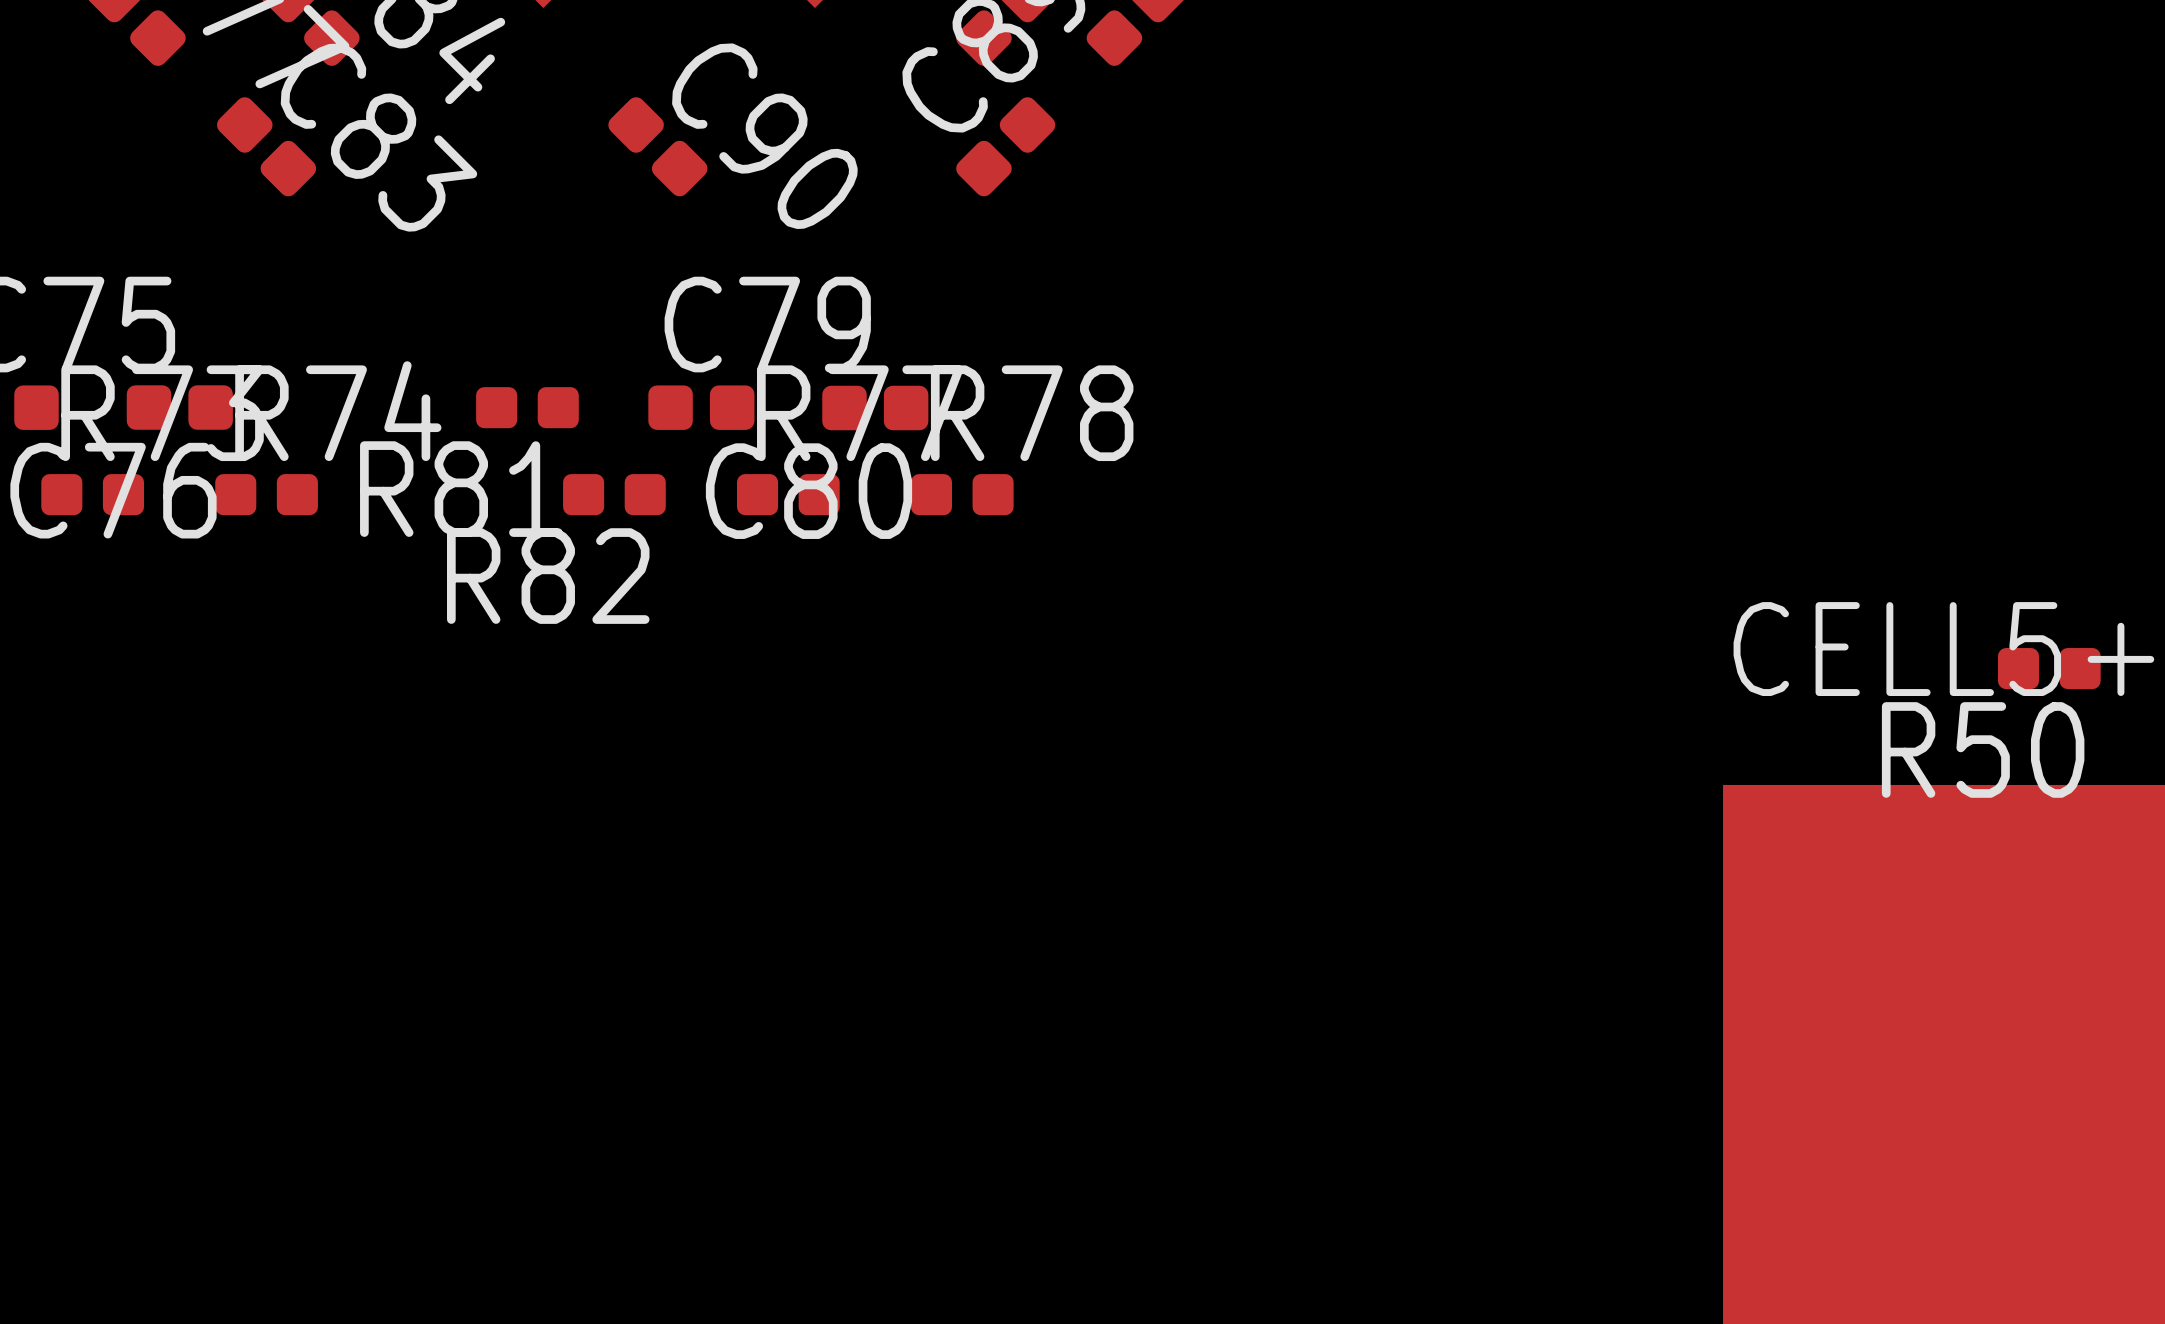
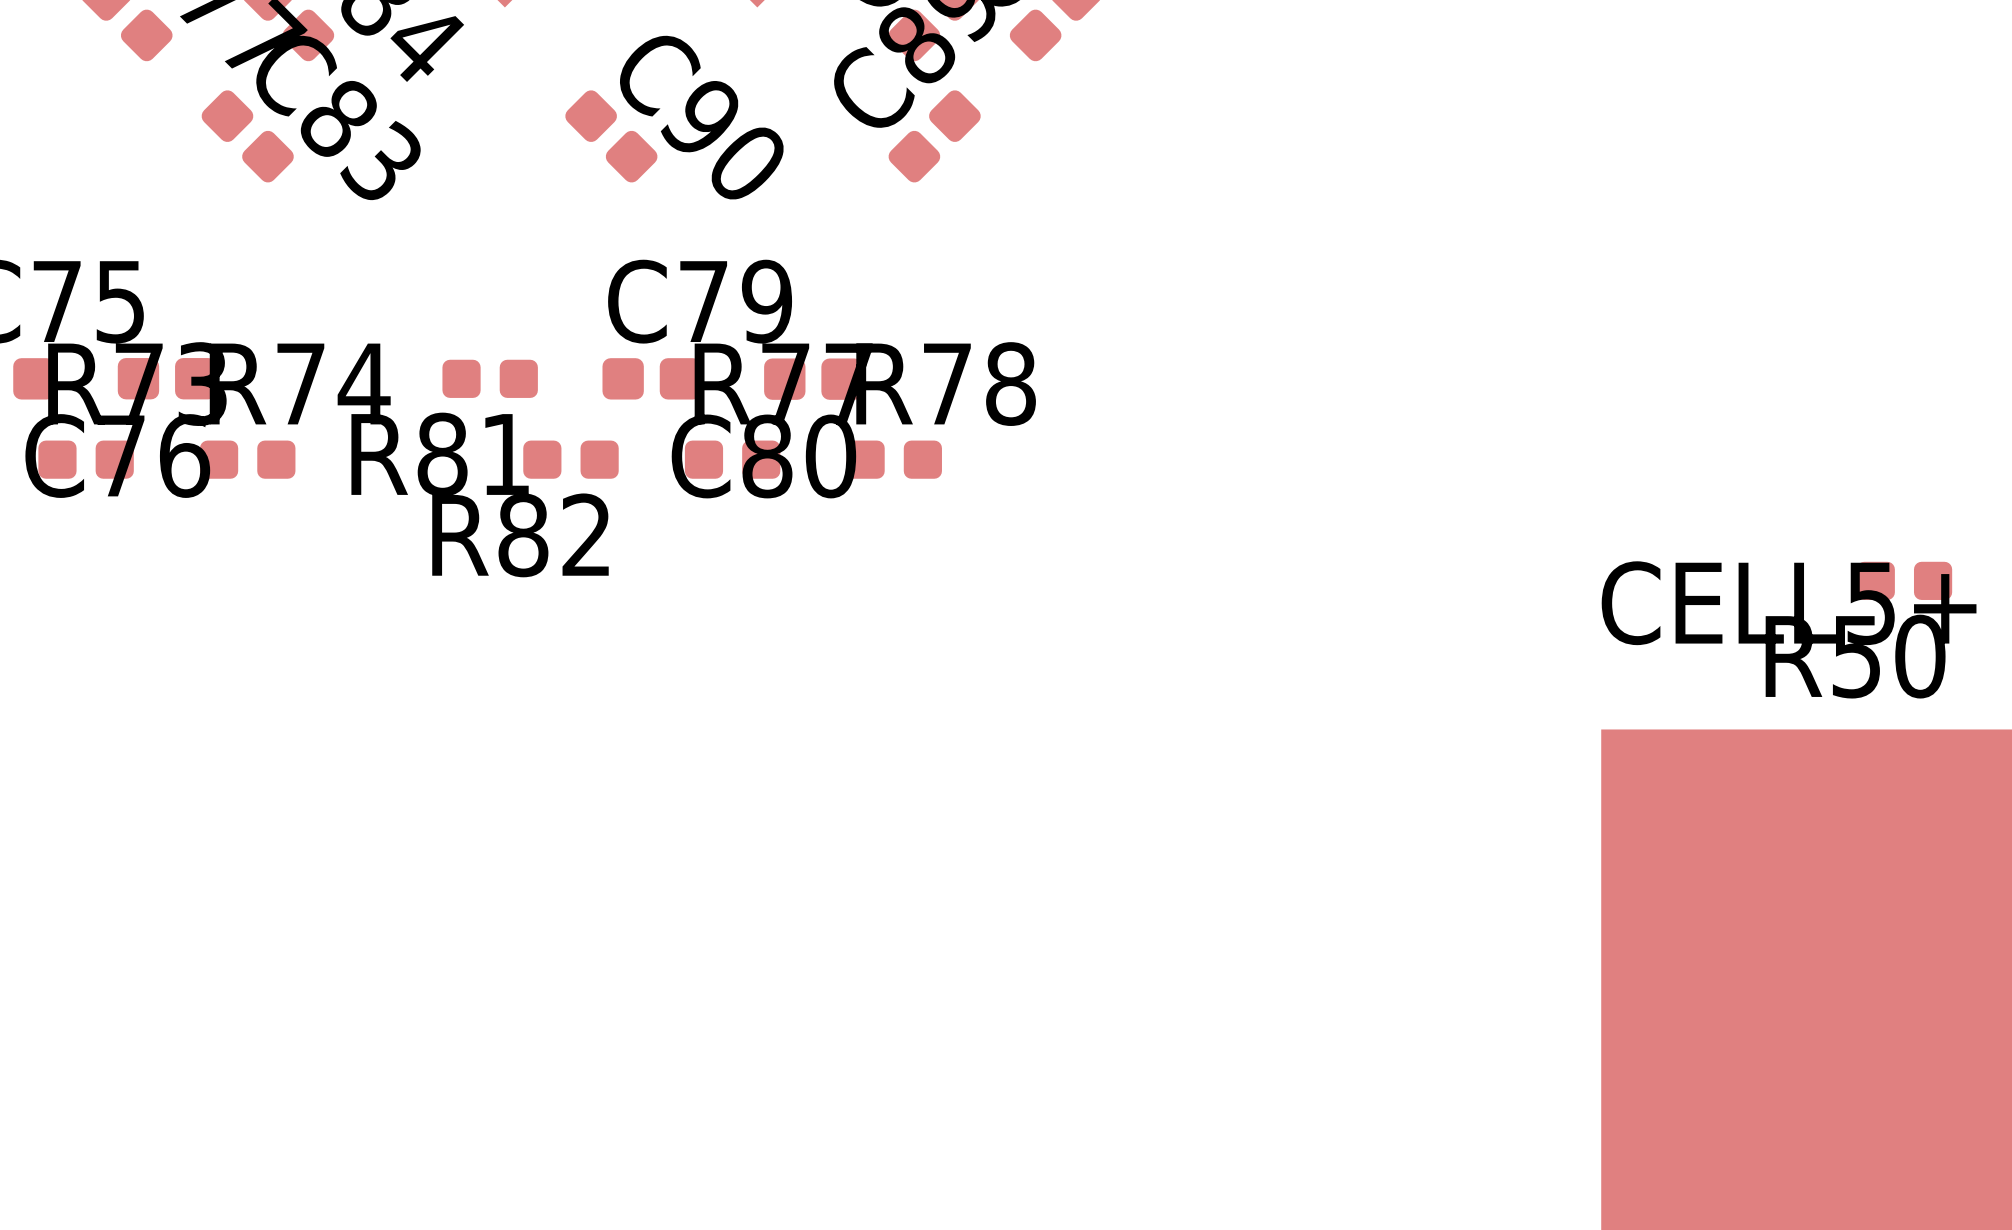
R50 position: (2049, 668) -> (1904, 580)

